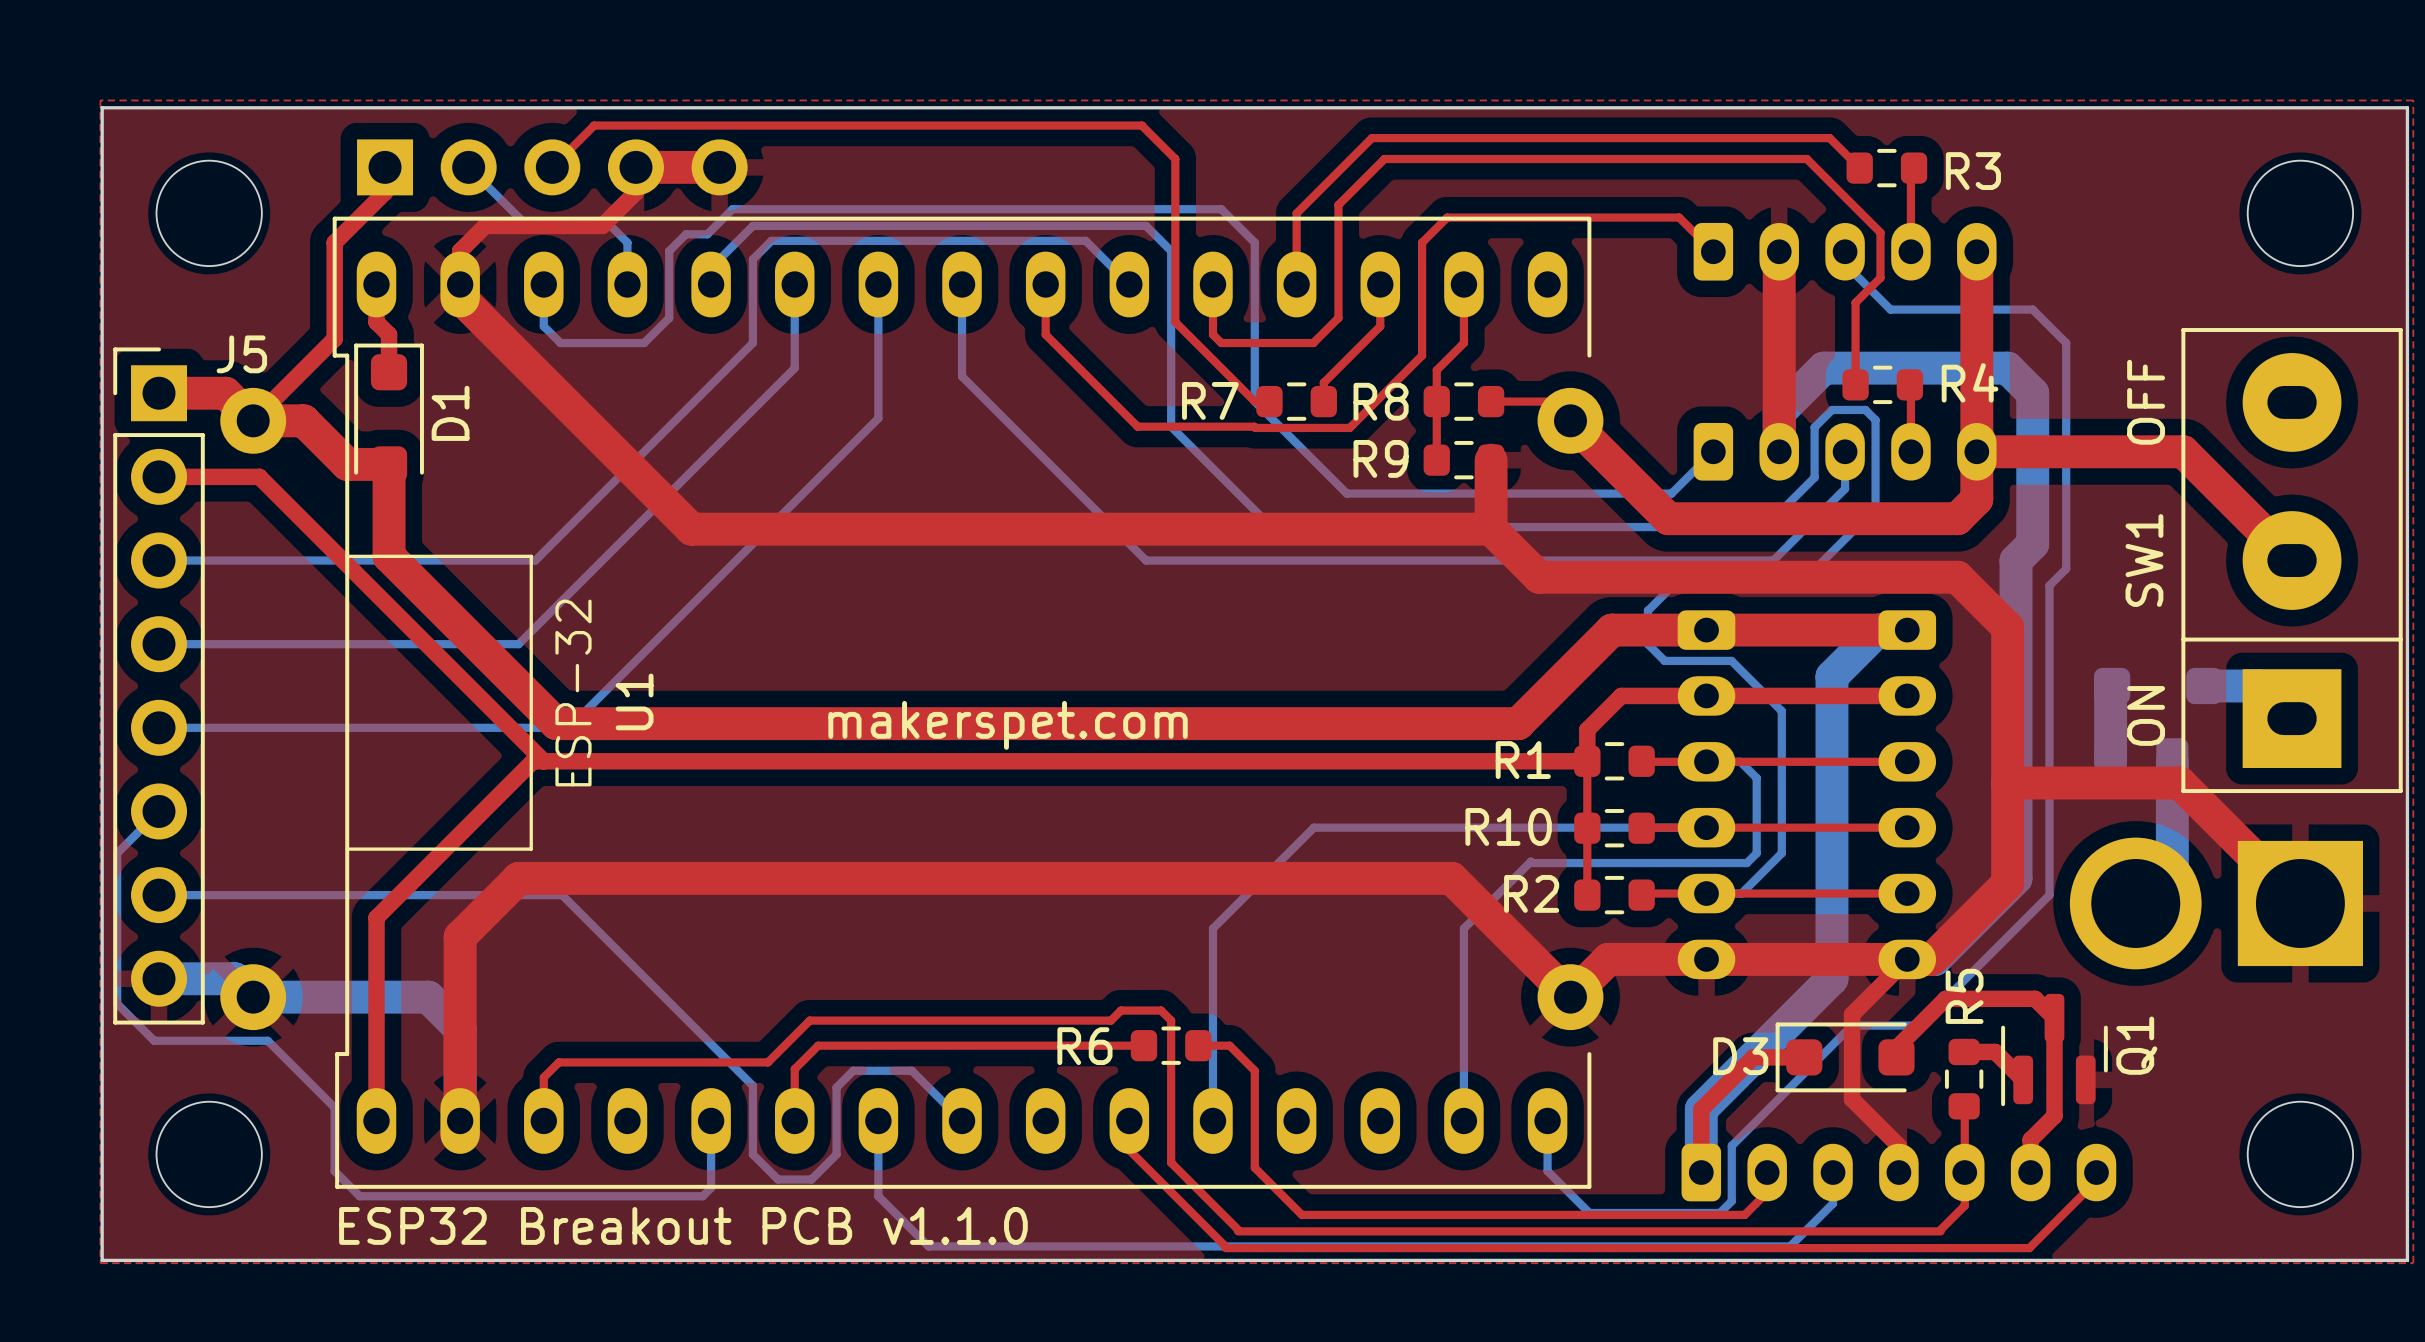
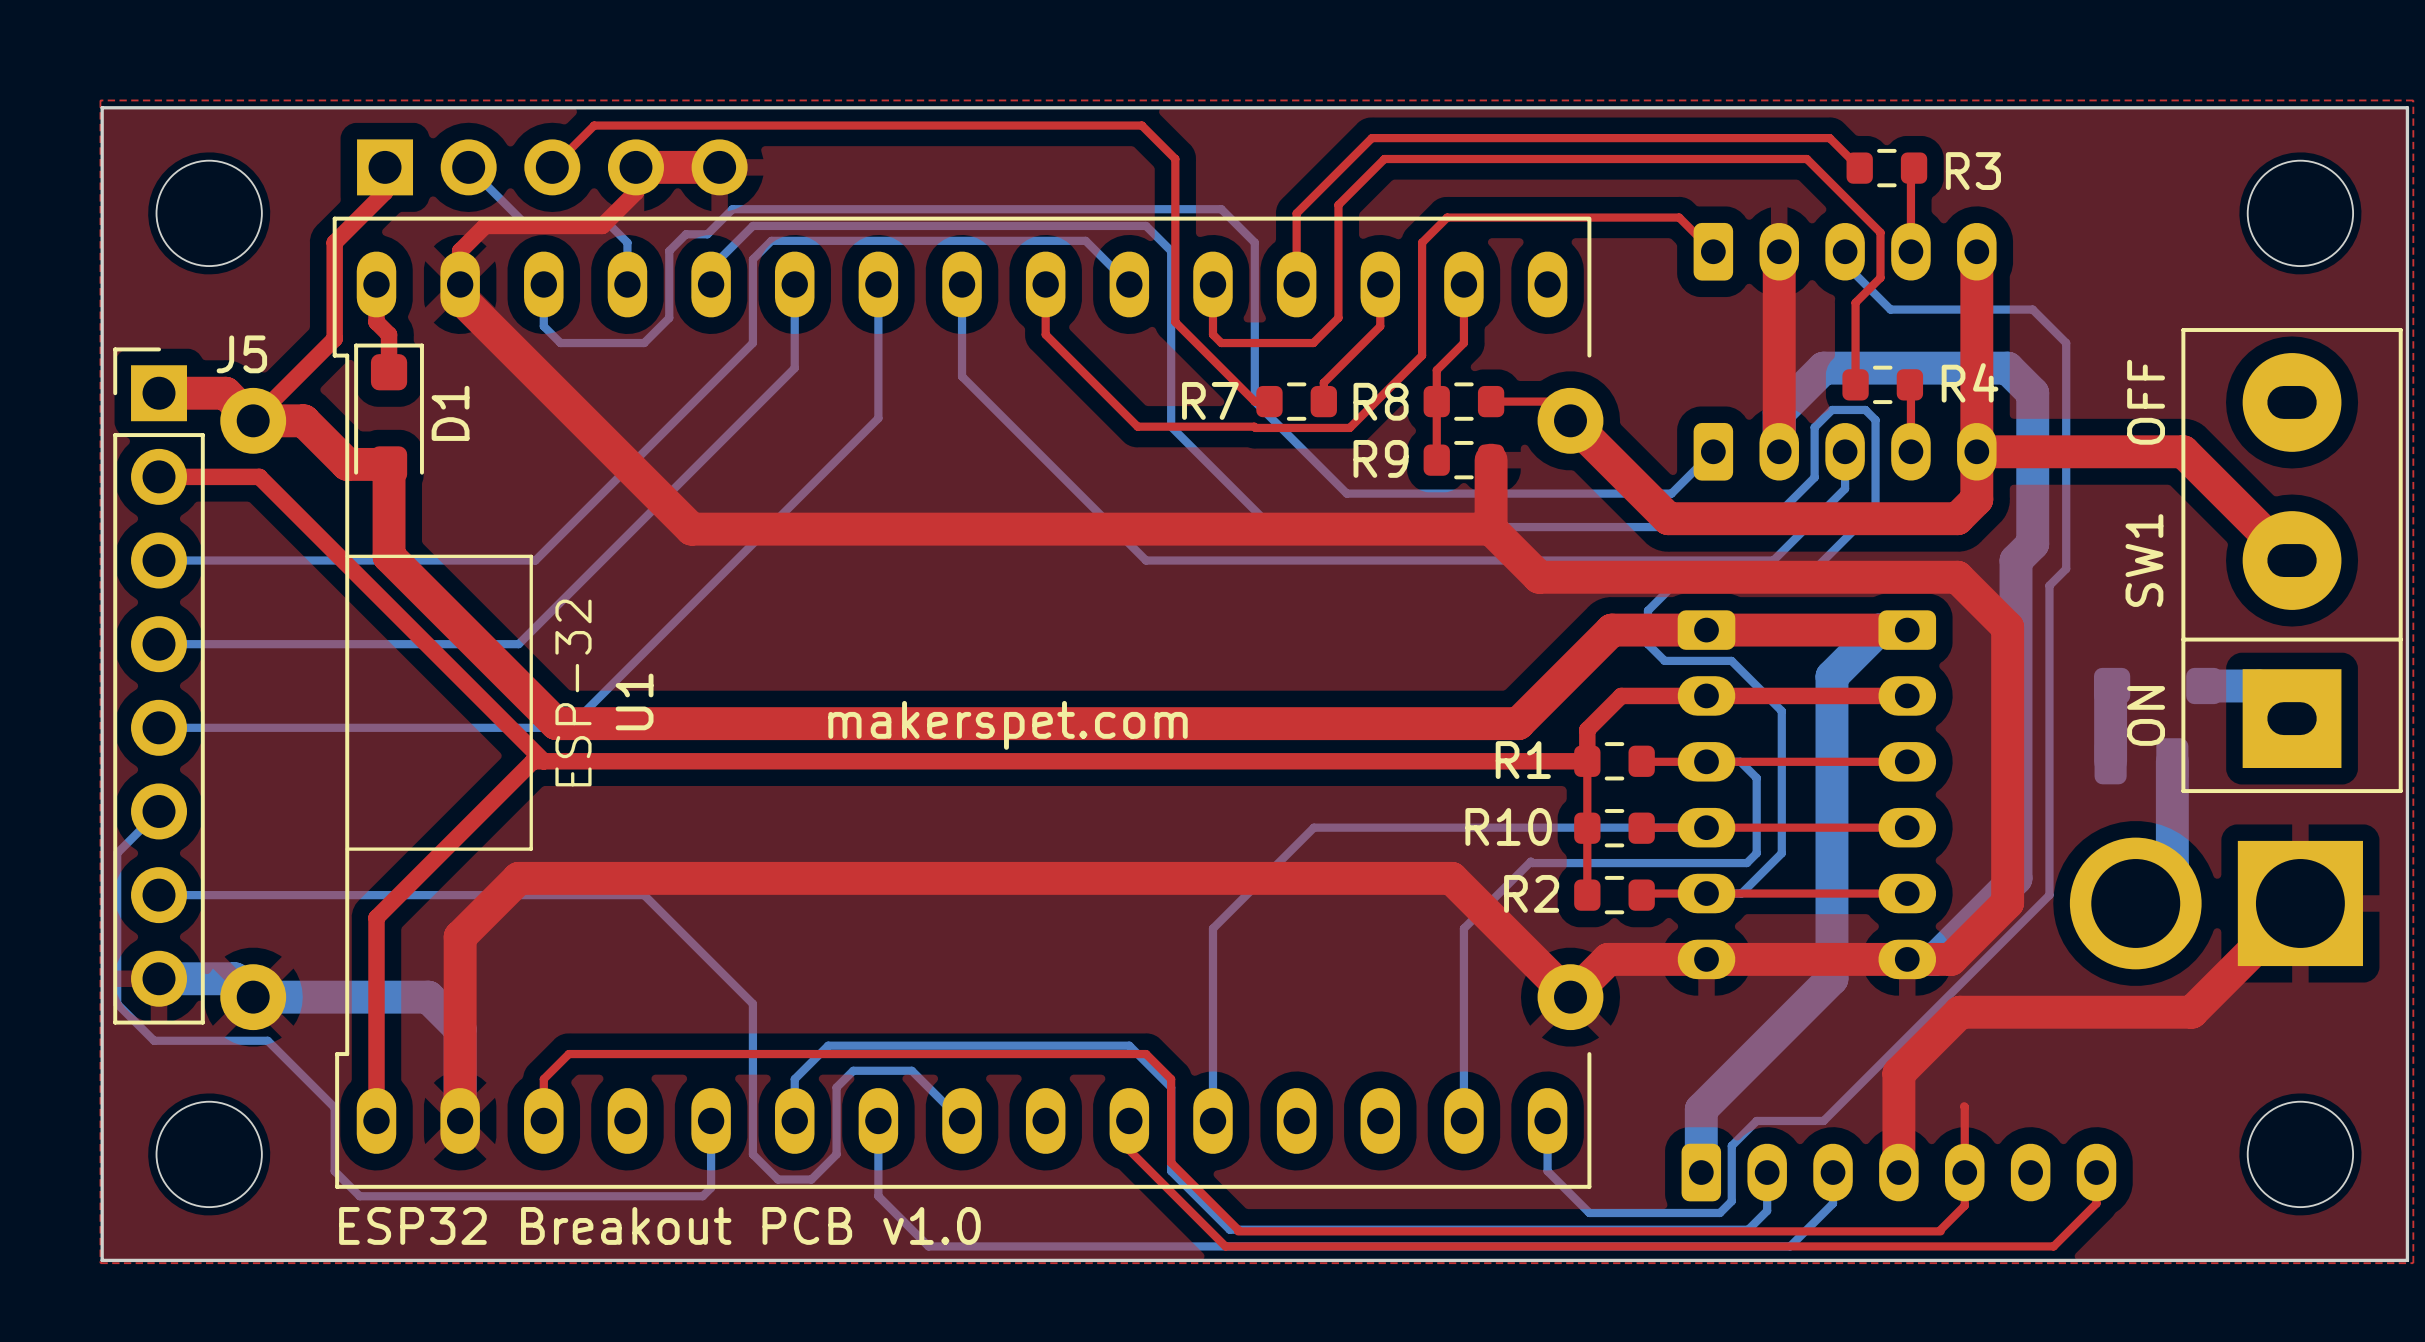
top track: (2007, 783) (2179, 783) (2300, 903) -> (1898, 1146) (1898, 1073) (1960, 1012) (2191, 1012) (2300, 903)
top track: (2007, 883) (1931, 959) -> (2007, 883) (2007, 902) (1950, 959) (1931, 959)
bottom track: (562, 895) (752, 1085) -> (562, 895) (644, 895) (752, 1003) (752, 1085)
top track: (1907, 959) (1852, 1014) (1852, 1099) (1898, 1146) -> none
bottom track: (1918, 1025) (1852, 1025) (1756, 1120) -> (1918, 1025) (1823, 1120) (1756, 1120)
top track: (1143, 1045) (818, 1045) (794, 1069) (794, 1120) -> none
R6: (1171, 1045) -> none
top track: (1198, 1045) (1229, 1045) (1254, 1070) (1254, 1167) (1301, 1214) (1744, 1214) (1767, 1192) (1767, 1172) -> none
Q1: (2054, 1050) -> none
top track: (1964, 1051) (1995, 1051) (2023, 1079) -> none
top track: (1804, 1057) (1753, 1057) (1701, 1109) (1701, 1172) -> none
D3: (1845, 1057) -> none
top track: (1897, 1057) (1896, 1048) (1945, 998) (2035, 998) (2054, 1018) (2054, 1115) (2030, 1139) (2030, 1172) -> none
top track: (543, 1079) (558, 1062) (767, 1062) (809, 1020) (1110, 1020) (1120, 1010) (1161, 1010) (1171, 1020) (1171, 1079) -> (543, 1079) (568, 1054) (1146, 1054) (1171, 1079)
R5: (1964, 1079) -> none
bottom track: none -> (794, 1120) (794, 1079) (828, 1045) (1129, 1045) (1171, 1087) (1171, 1171) (1229, 1229) (1748, 1229) (1767, 1210) (1767, 1172)
top track: (2096, 1181) (2029, 1248) (1225, 1248) -> (2096, 1181) (2096, 1203) (2053, 1246) (1225, 1246)
text: ESP32 Breakout PCB v1.1.0 (683, 1225) -> ESP32 Breakout PCB v1.0 (659, 1225)

